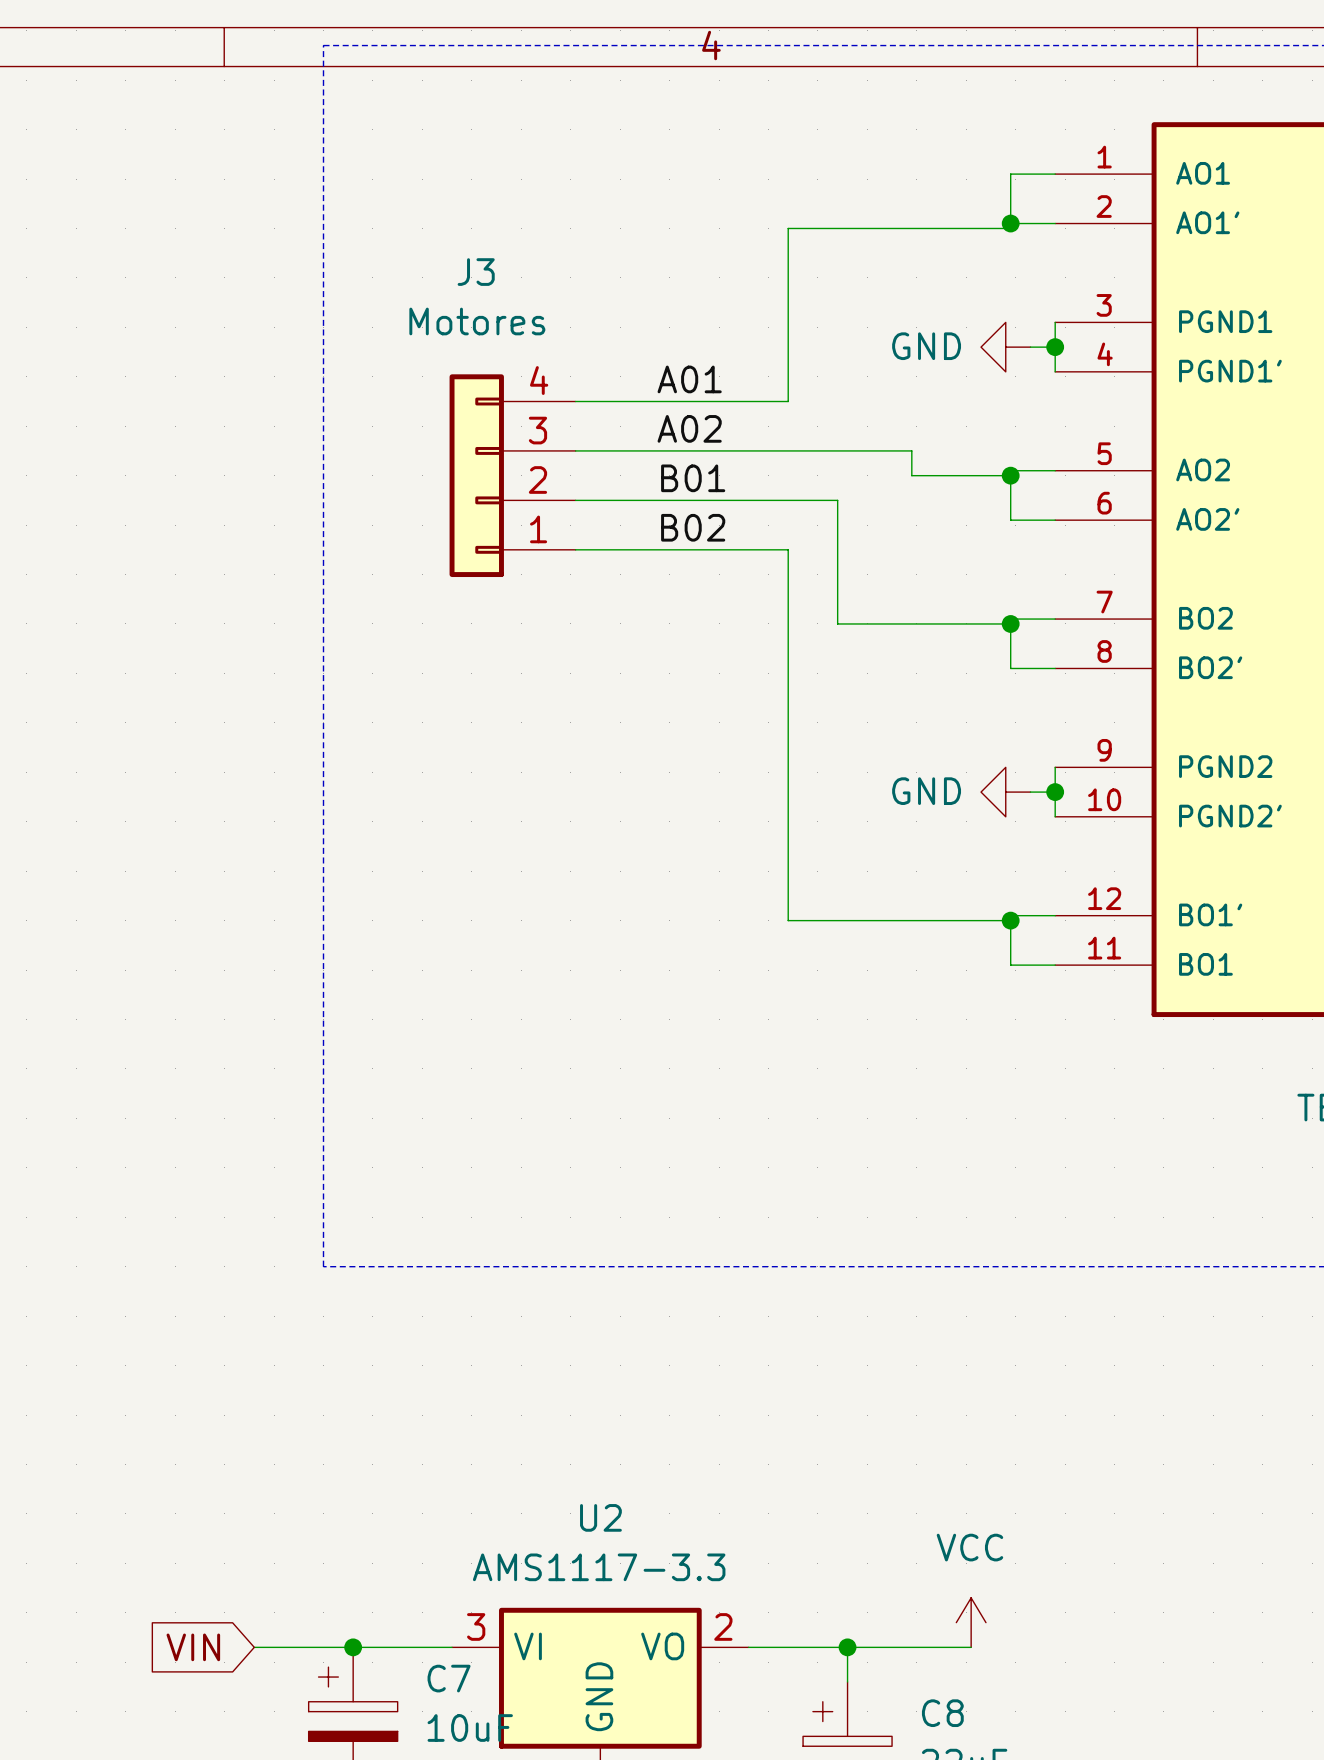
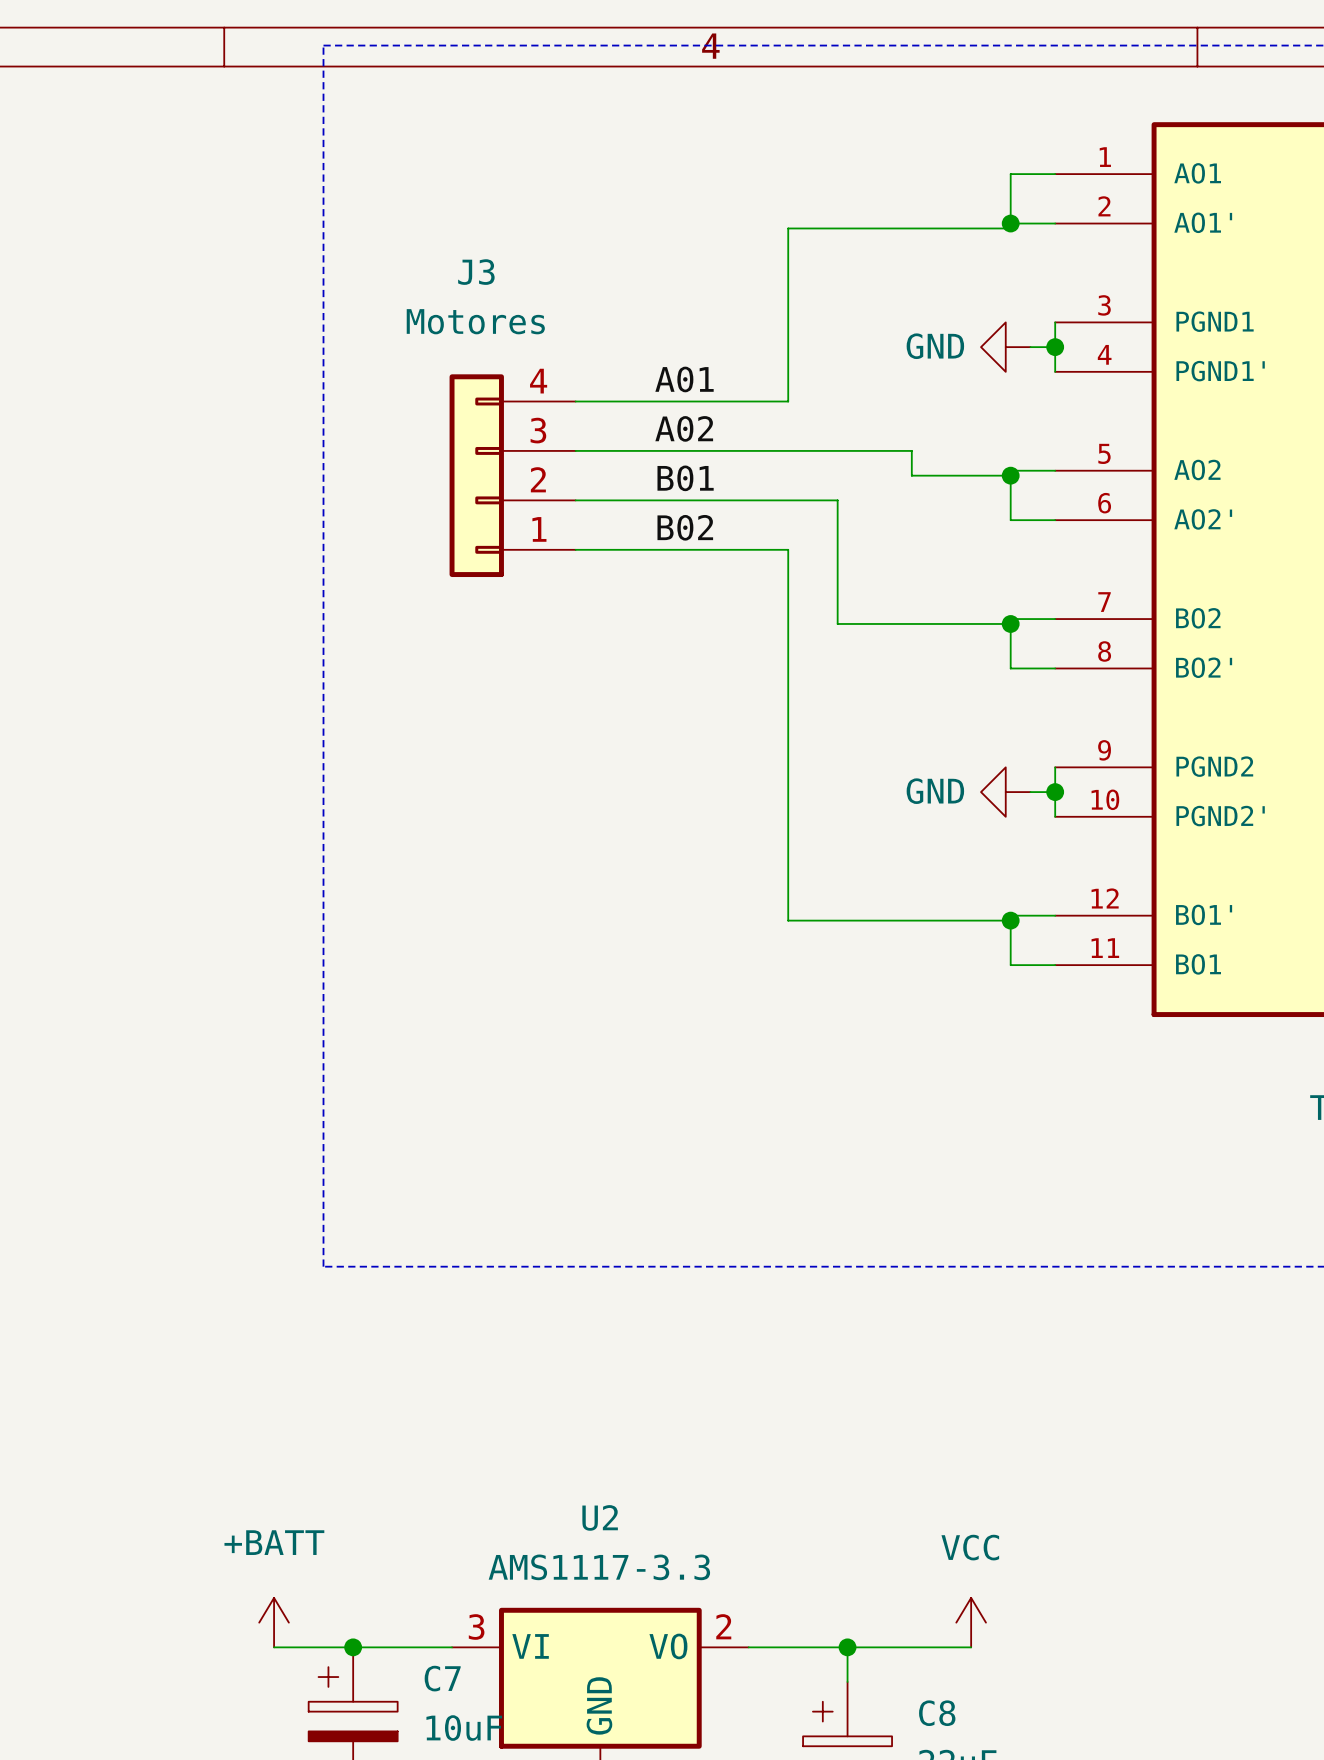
power symbol: none -> +BATT (274, 1622)
global label: VIN (193, 1647) -> none
wire: (254, 1647) (274, 1647) -> none

